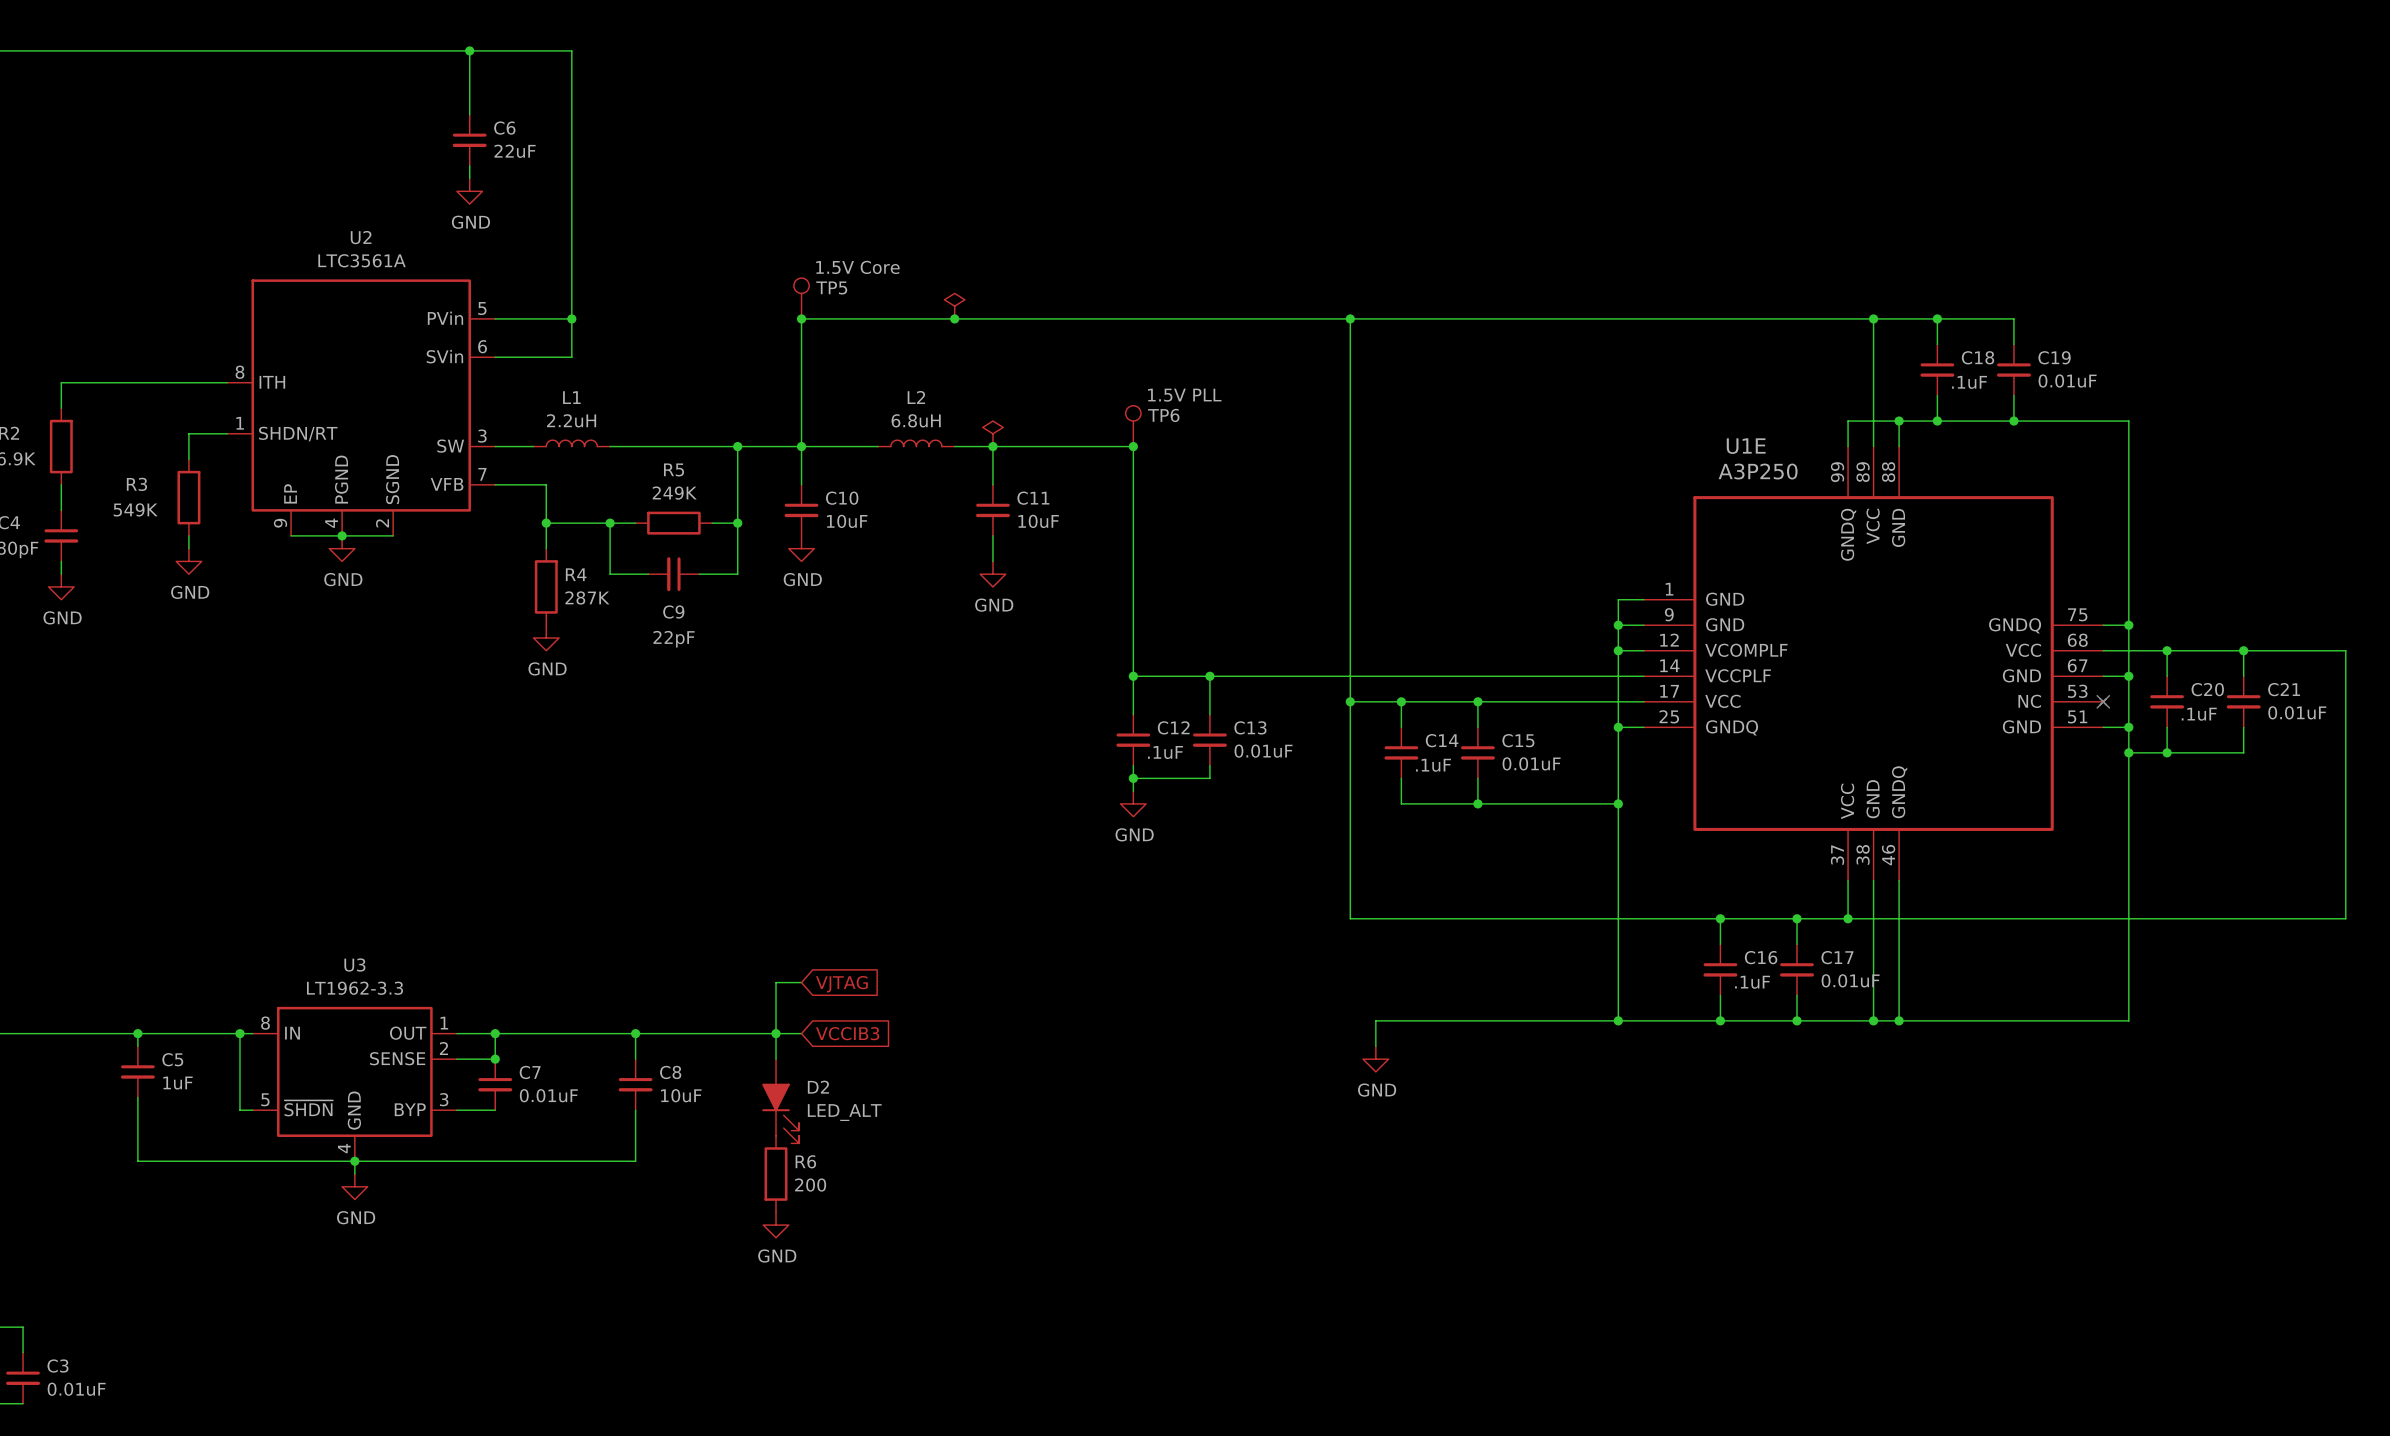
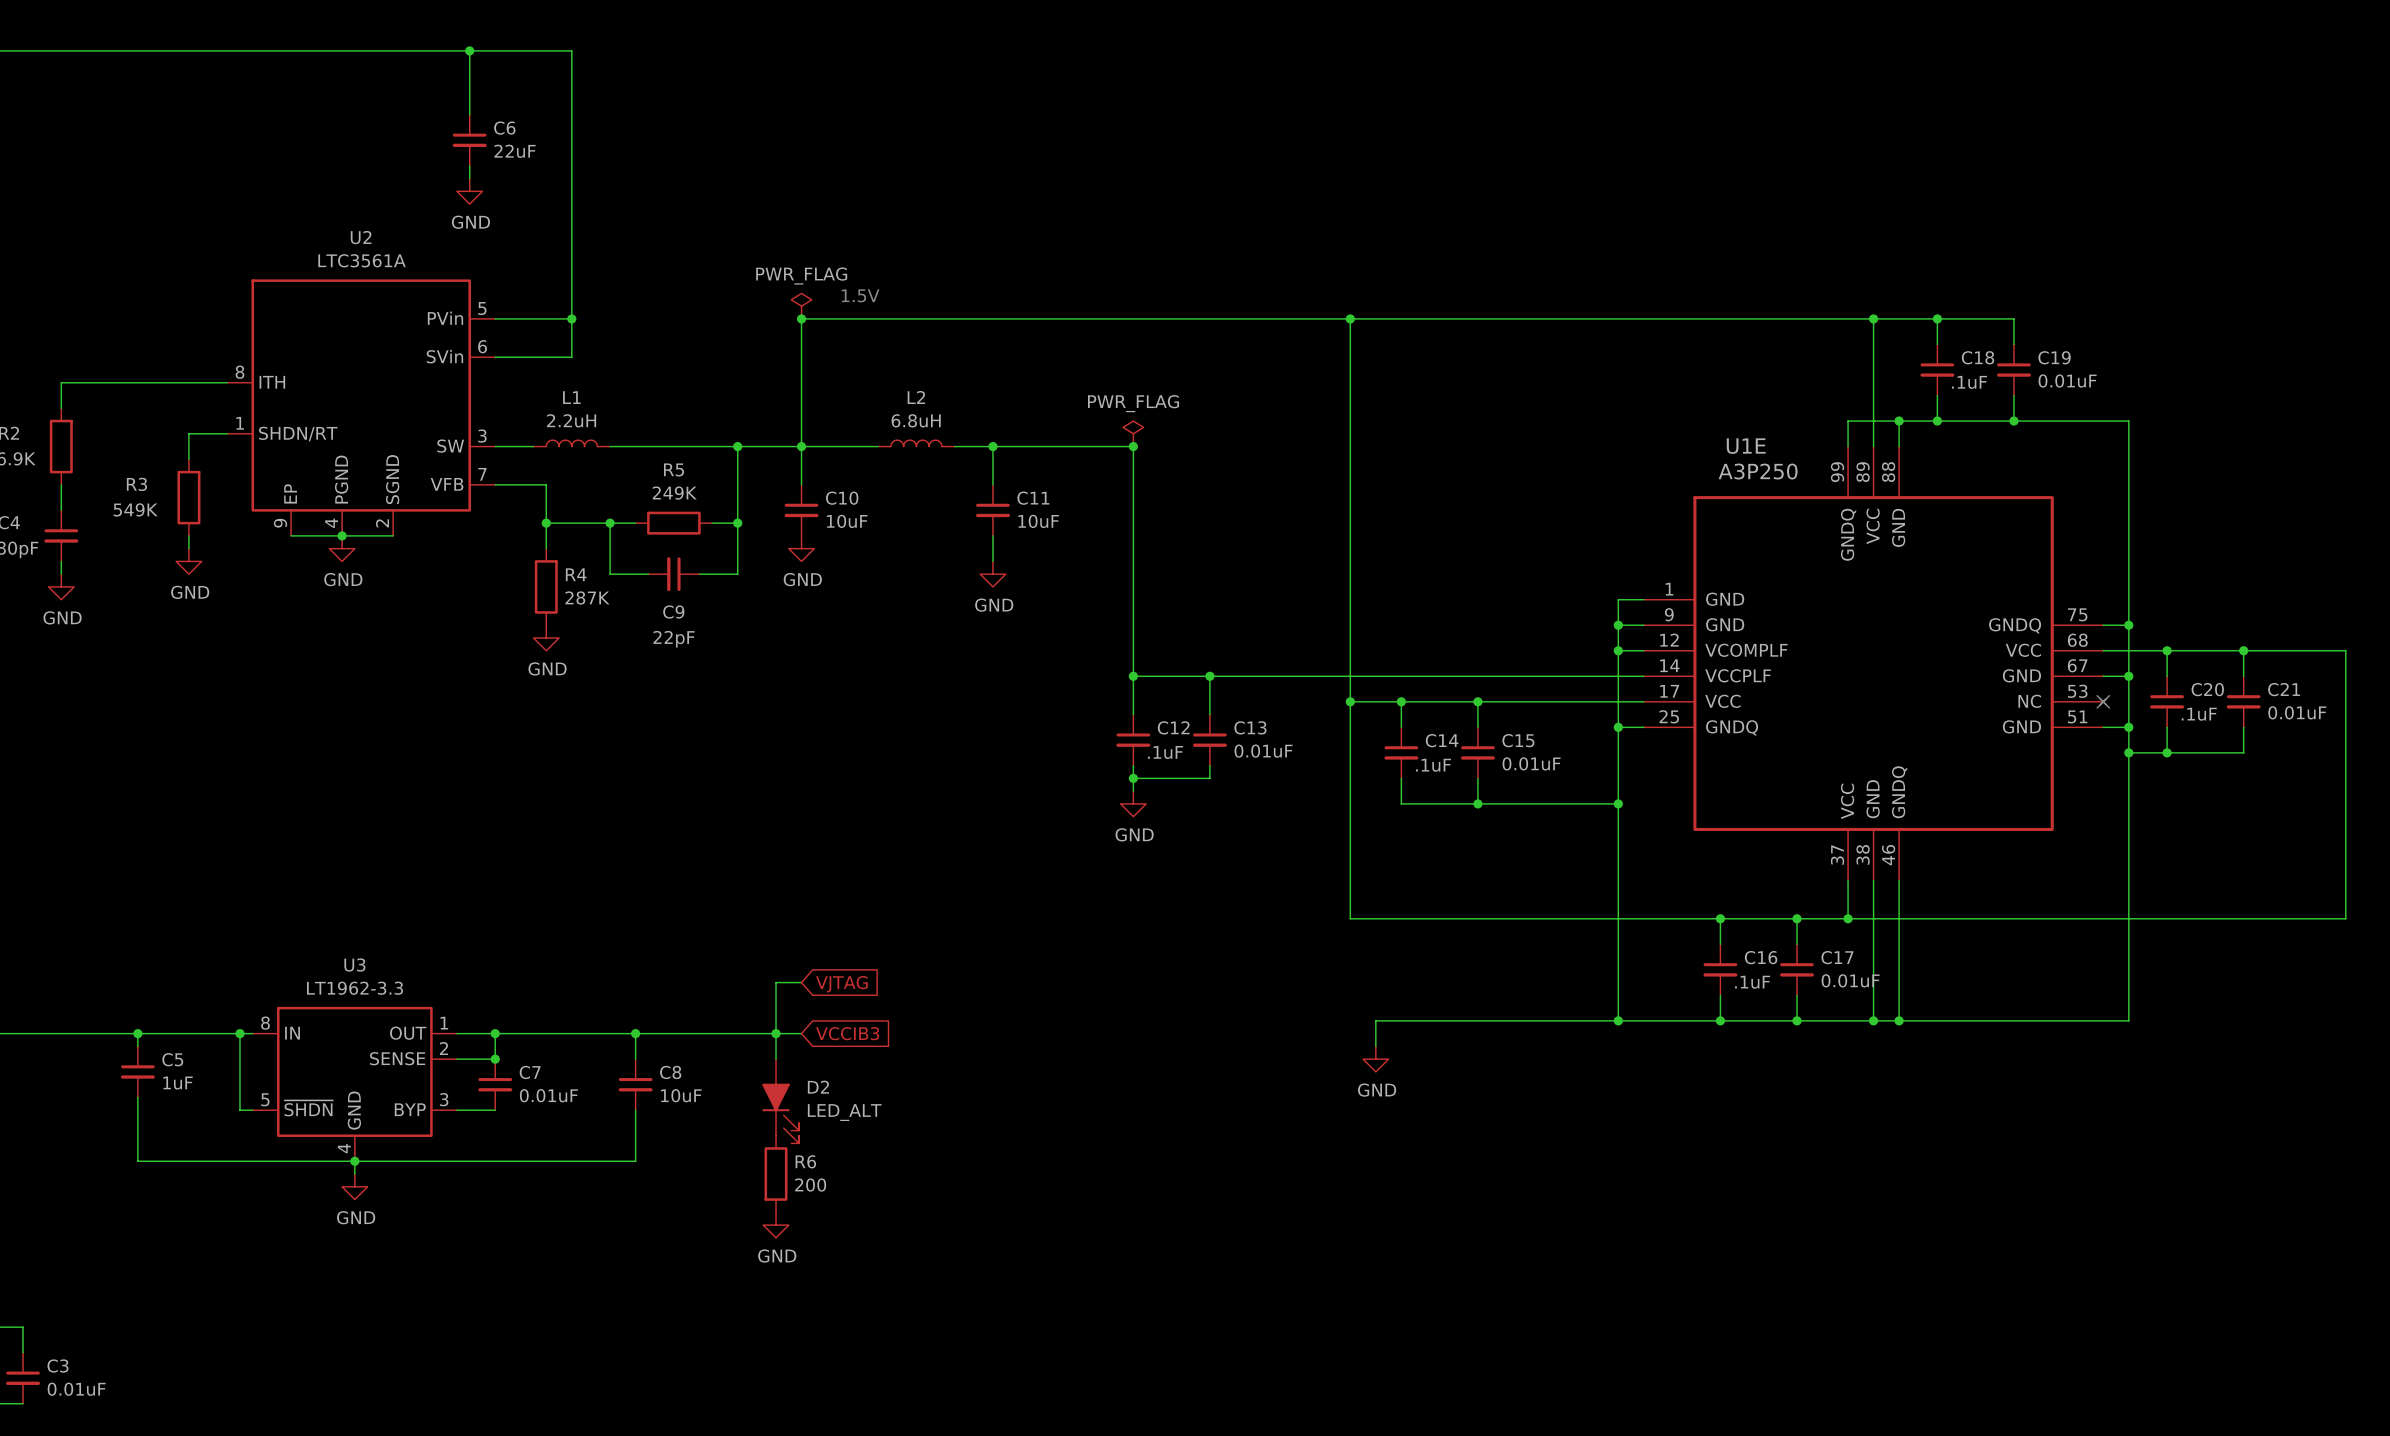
text: none -> 1.5V (860, 295)
TP5: 1.5V Core (801, 298) -> none
power symbol: none -> PWR_FLAG (801, 306)
power symbol: (954, 306) -> none
junction: (954, 318) -> none
TP6: 1.5V PLL (1133, 426) -> none
power symbol: (992, 433) -> none
power symbol: none -> PWR_FLAG (1133, 433)

